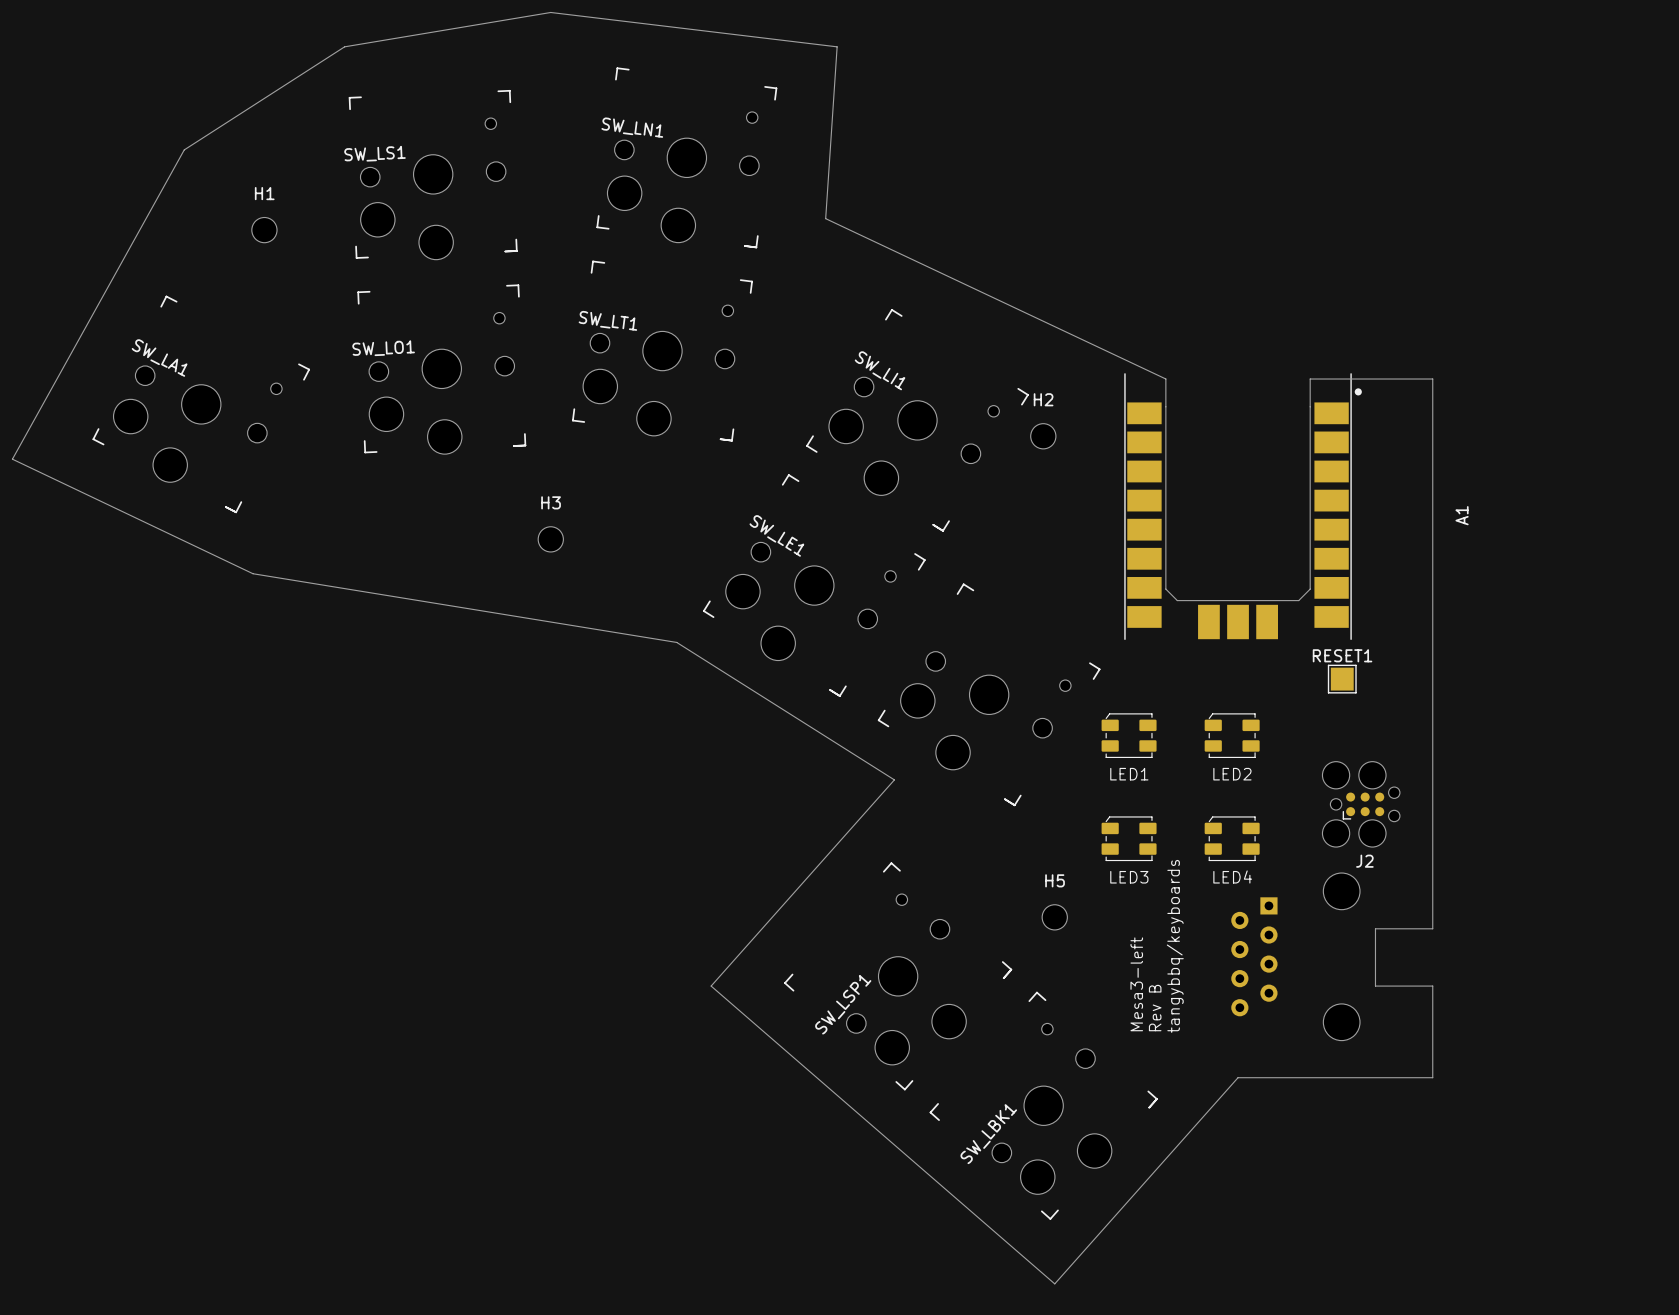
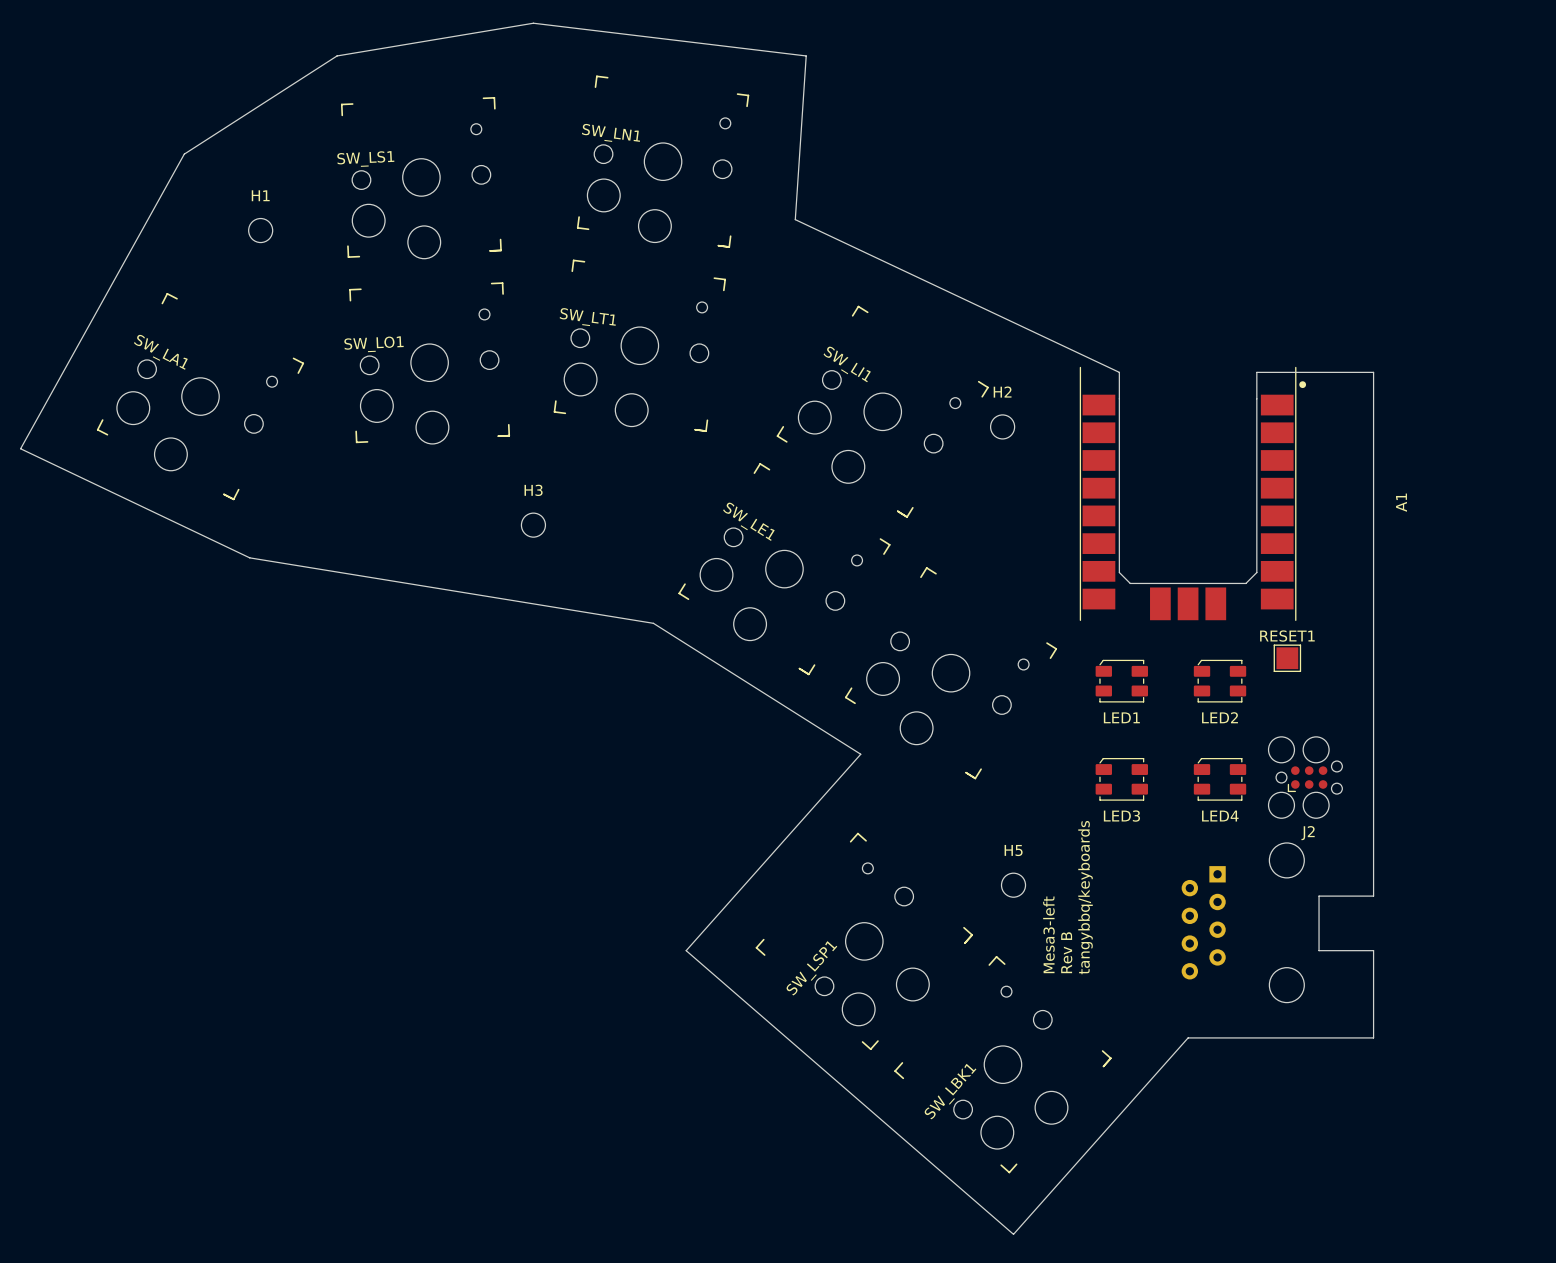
LED1 position: (1129, 735) -> (1121, 681)
LED2 position: (1232, 735) -> (1220, 681)
LED3 position: (1129, 838) -> (1121, 779)
LED4 position: (1232, 838) -> (1220, 779)
text position: tangybbq/keyboards (1175, 946) -> tangybbq/keyboards (1085, 897)
text position: Mesa3-left (1136, 984) -> Mesa3-left (1048, 934)
text position: Rev B (1155, 1008) -> Rev B (1066, 952)

